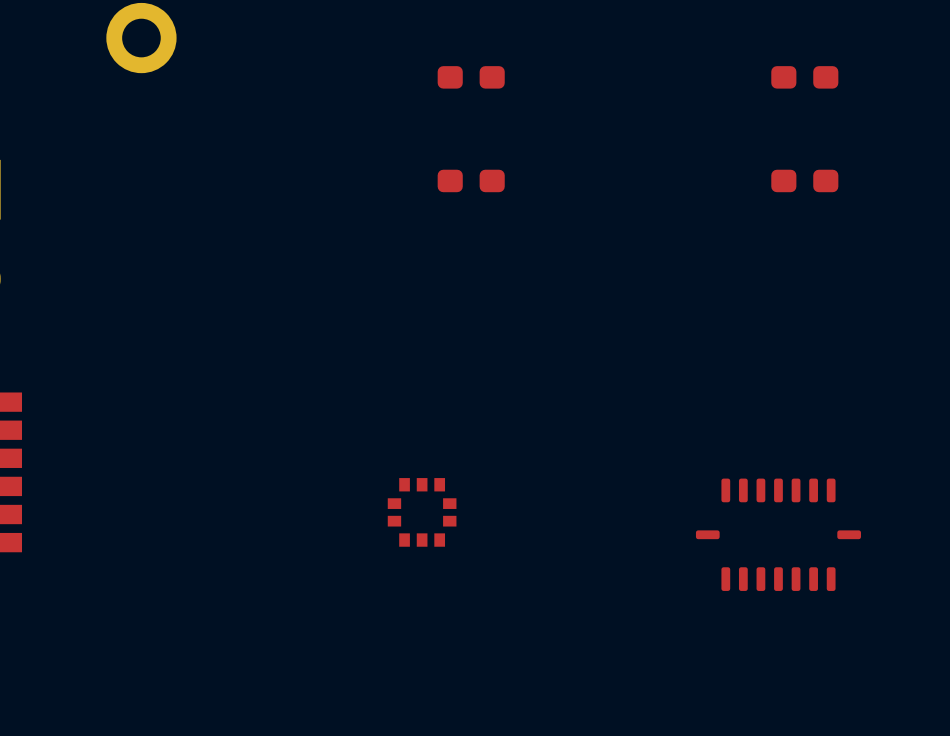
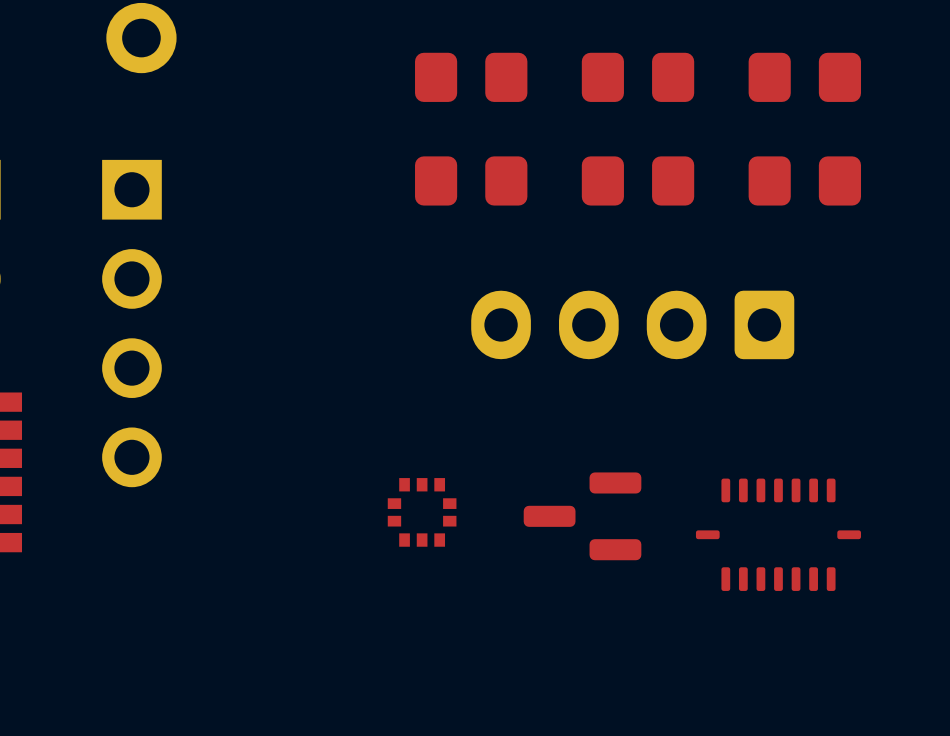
part footprint: [437, 66, 505, 89] -> [415, 52, 528, 102]
part footprint: [771, 66, 839, 89] -> [748, 52, 862, 102]
part: none -> (638, 77)
part footprint: [437, 169, 505, 193] -> [415, 156, 528, 206]
part footprint: [771, 169, 839, 193] -> [748, 156, 862, 206]
part: none -> (638, 180)
part: none -> (131, 323)
part: none -> (632, 324)
part: none -> (582, 516)

